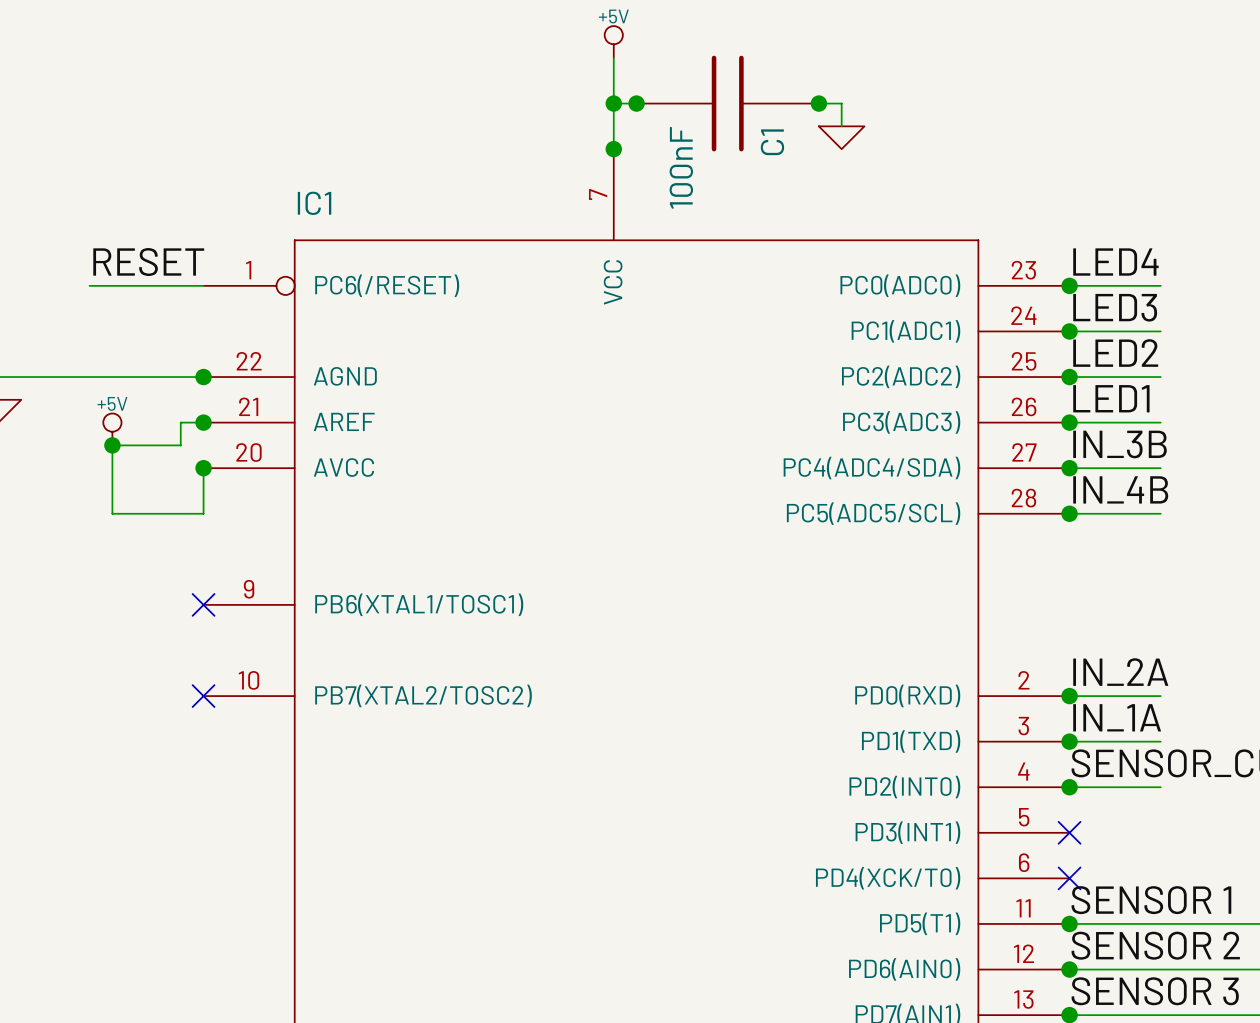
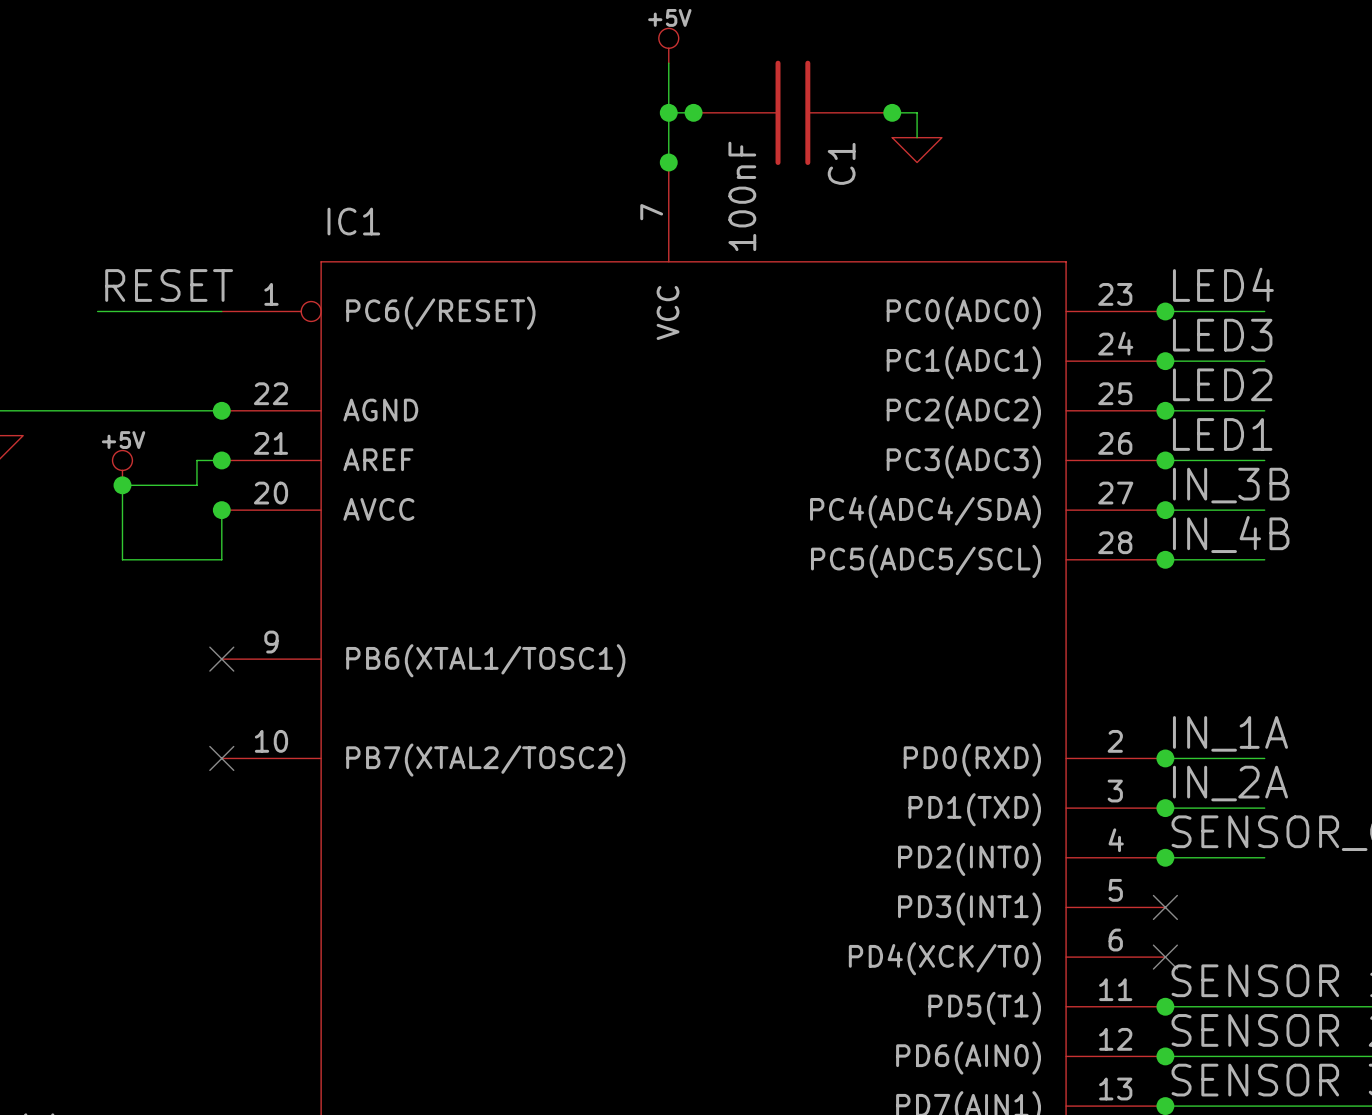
label: IN_2A (1120, 672) -> IN_1A (1230, 733)
label: IN_1A (1117, 717) -> IN_2A (1230, 783)

